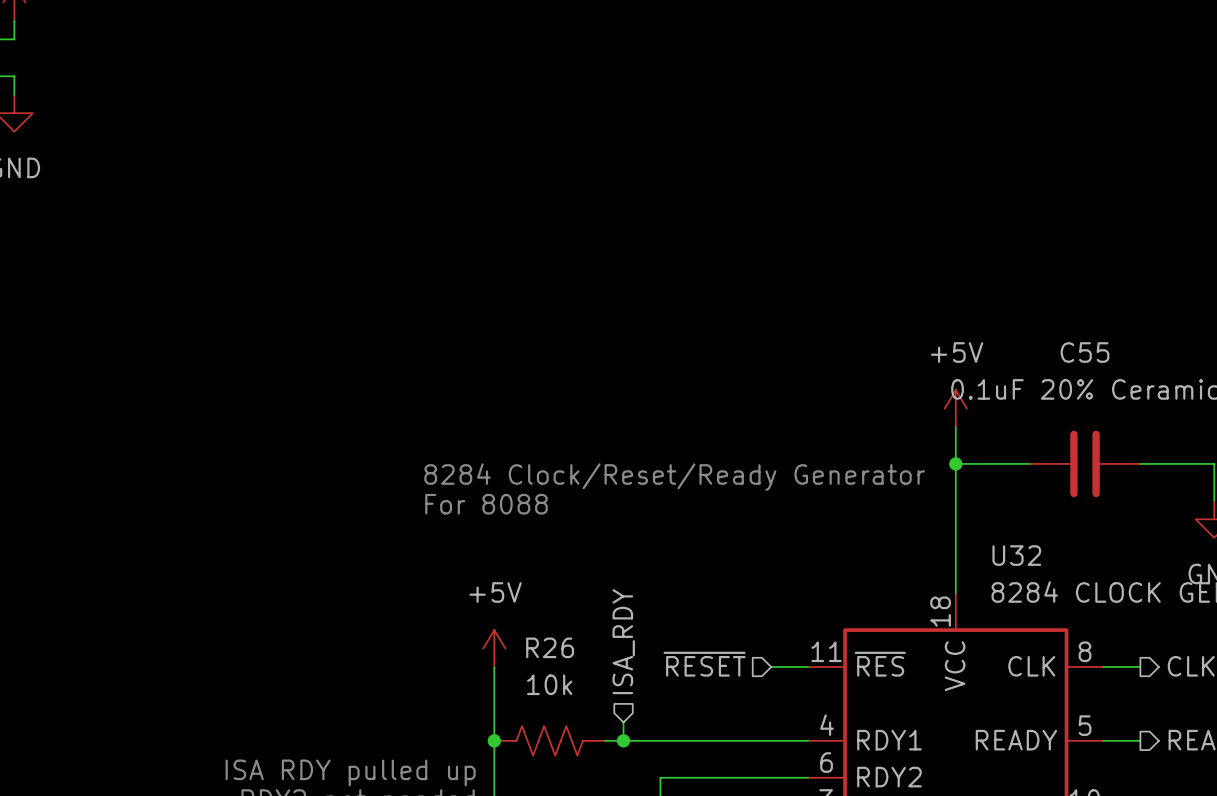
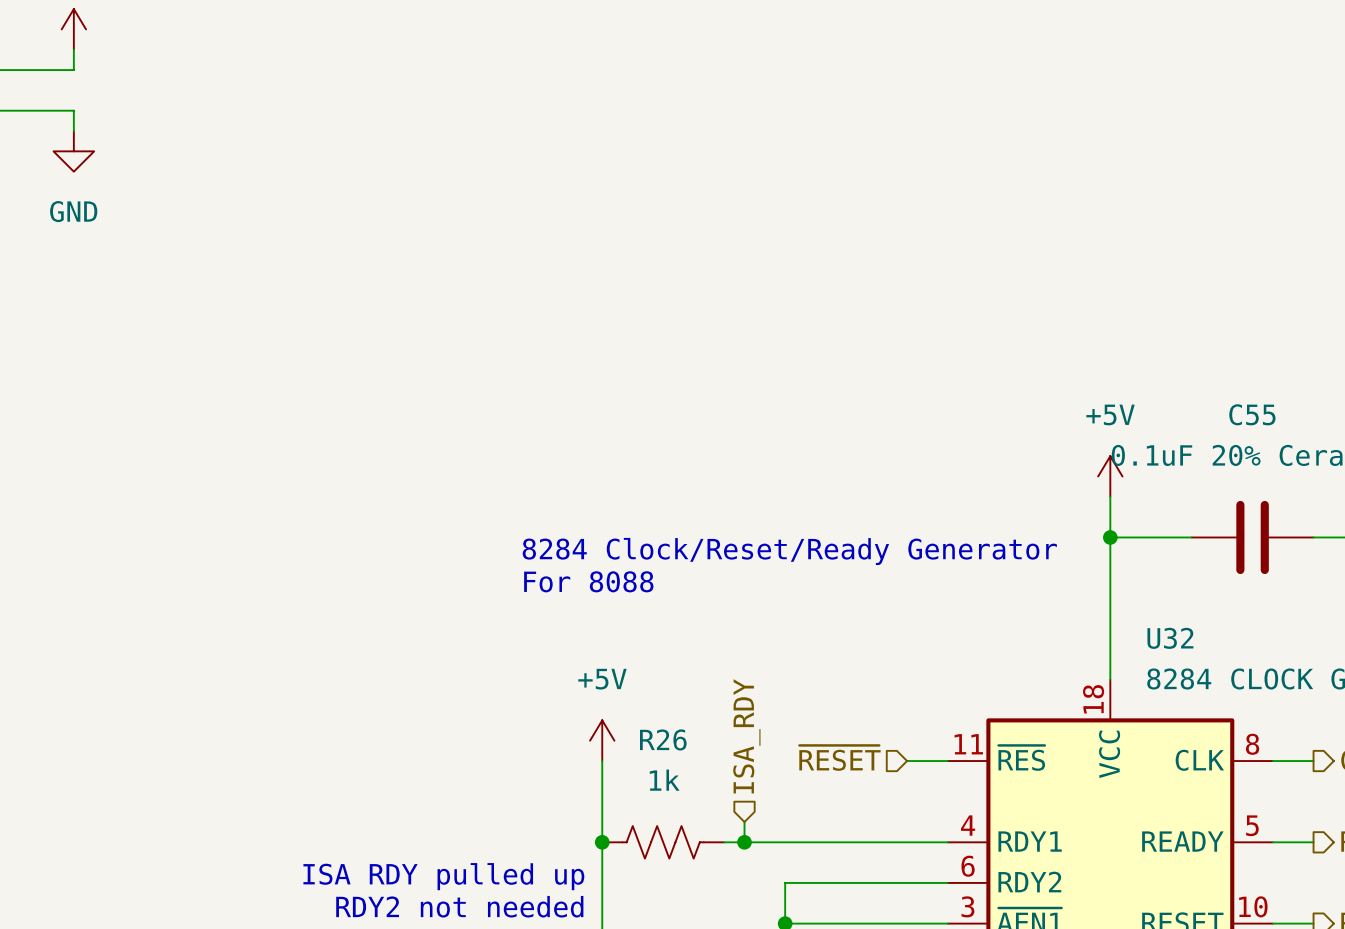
R26 value: 10k (549, 684) -> 1k (664, 780)

